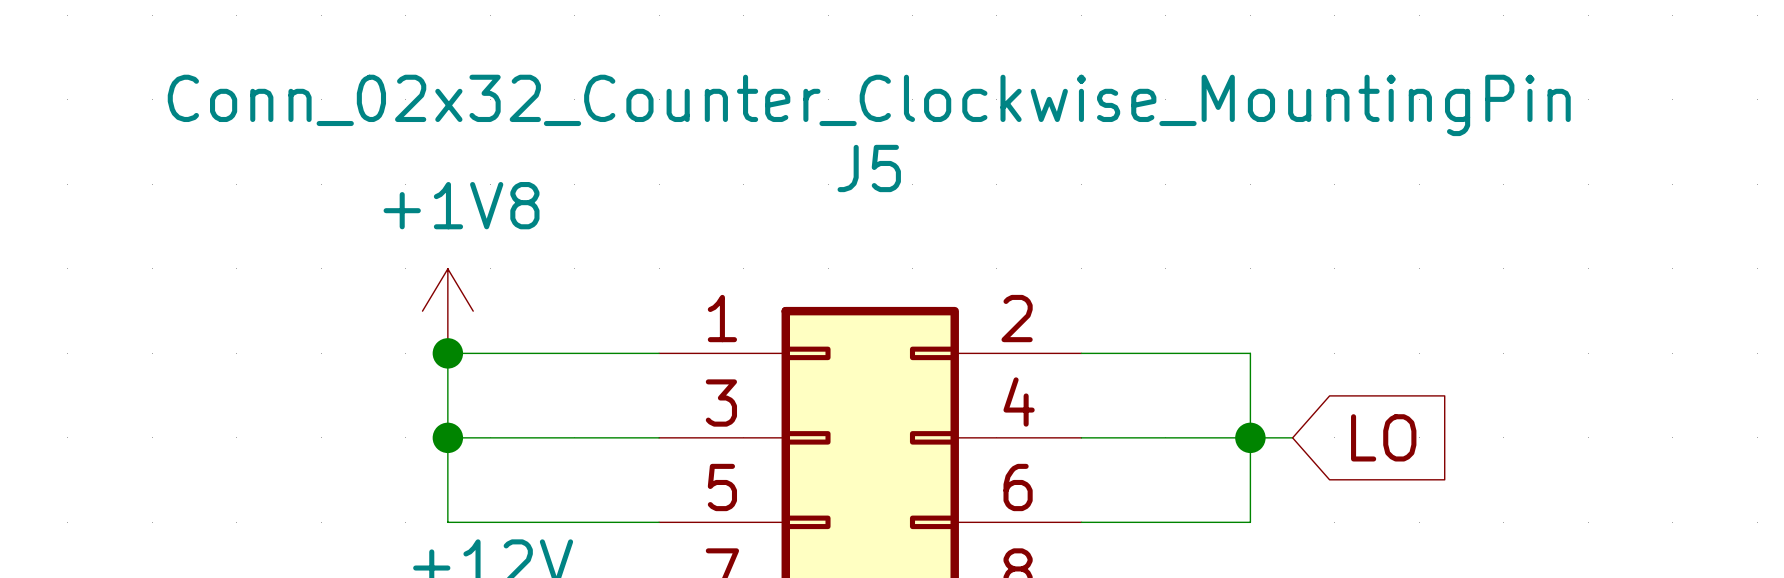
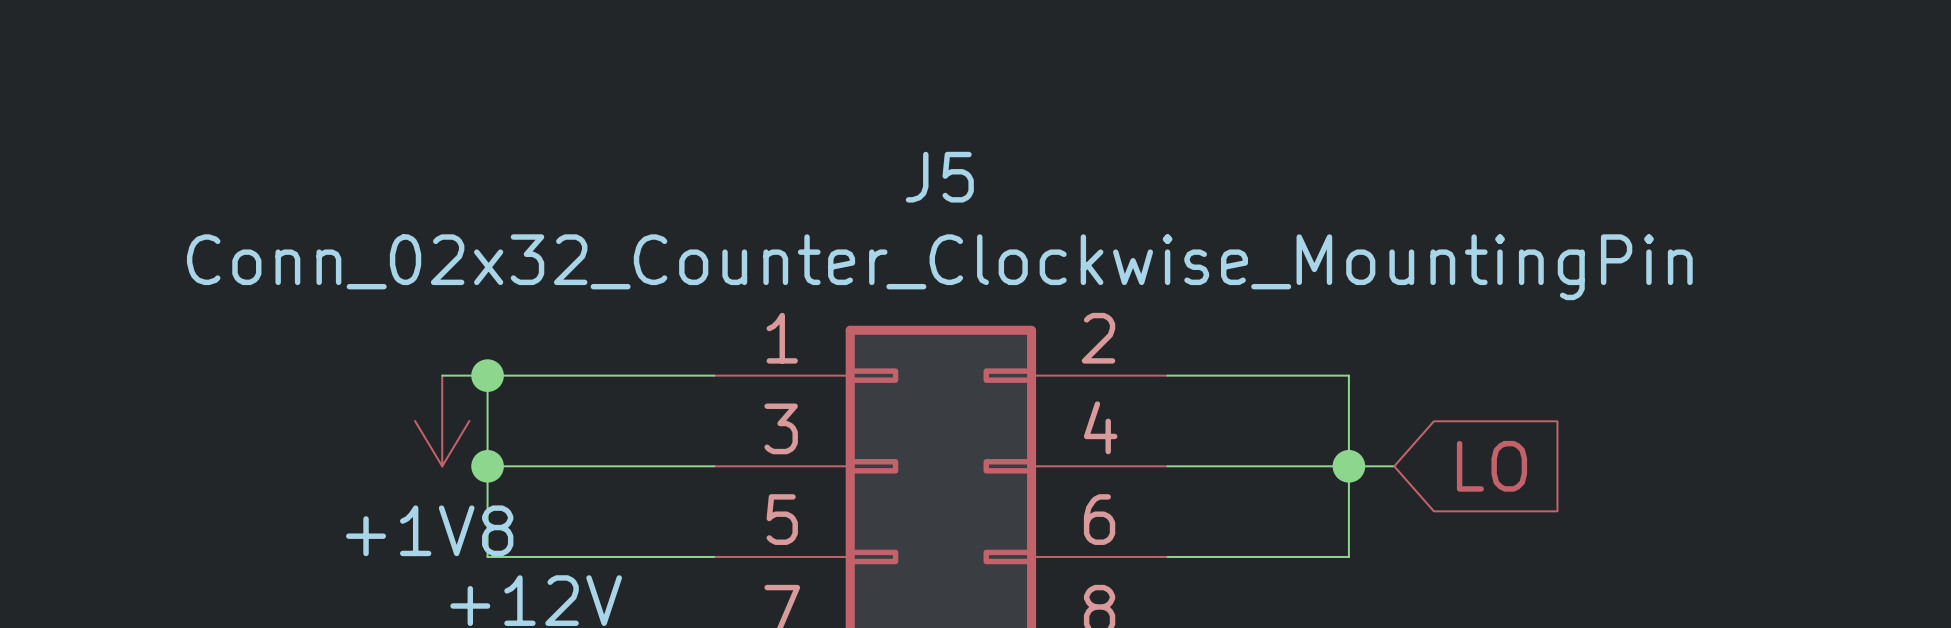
J5 value position: Conn_02x32_Counter_Clockwise_MountingPin (869, 105) -> Conn_02x32_Counter_Clockwise_MountingPin (939, 267)
power symbol rotation: 0° (447, 311) -> 180° (442, 420)
power symbol position: +1V8 (447, 311) -> +1V8 (442, 420)
wire: none -> (442, 375) (487, 375)

